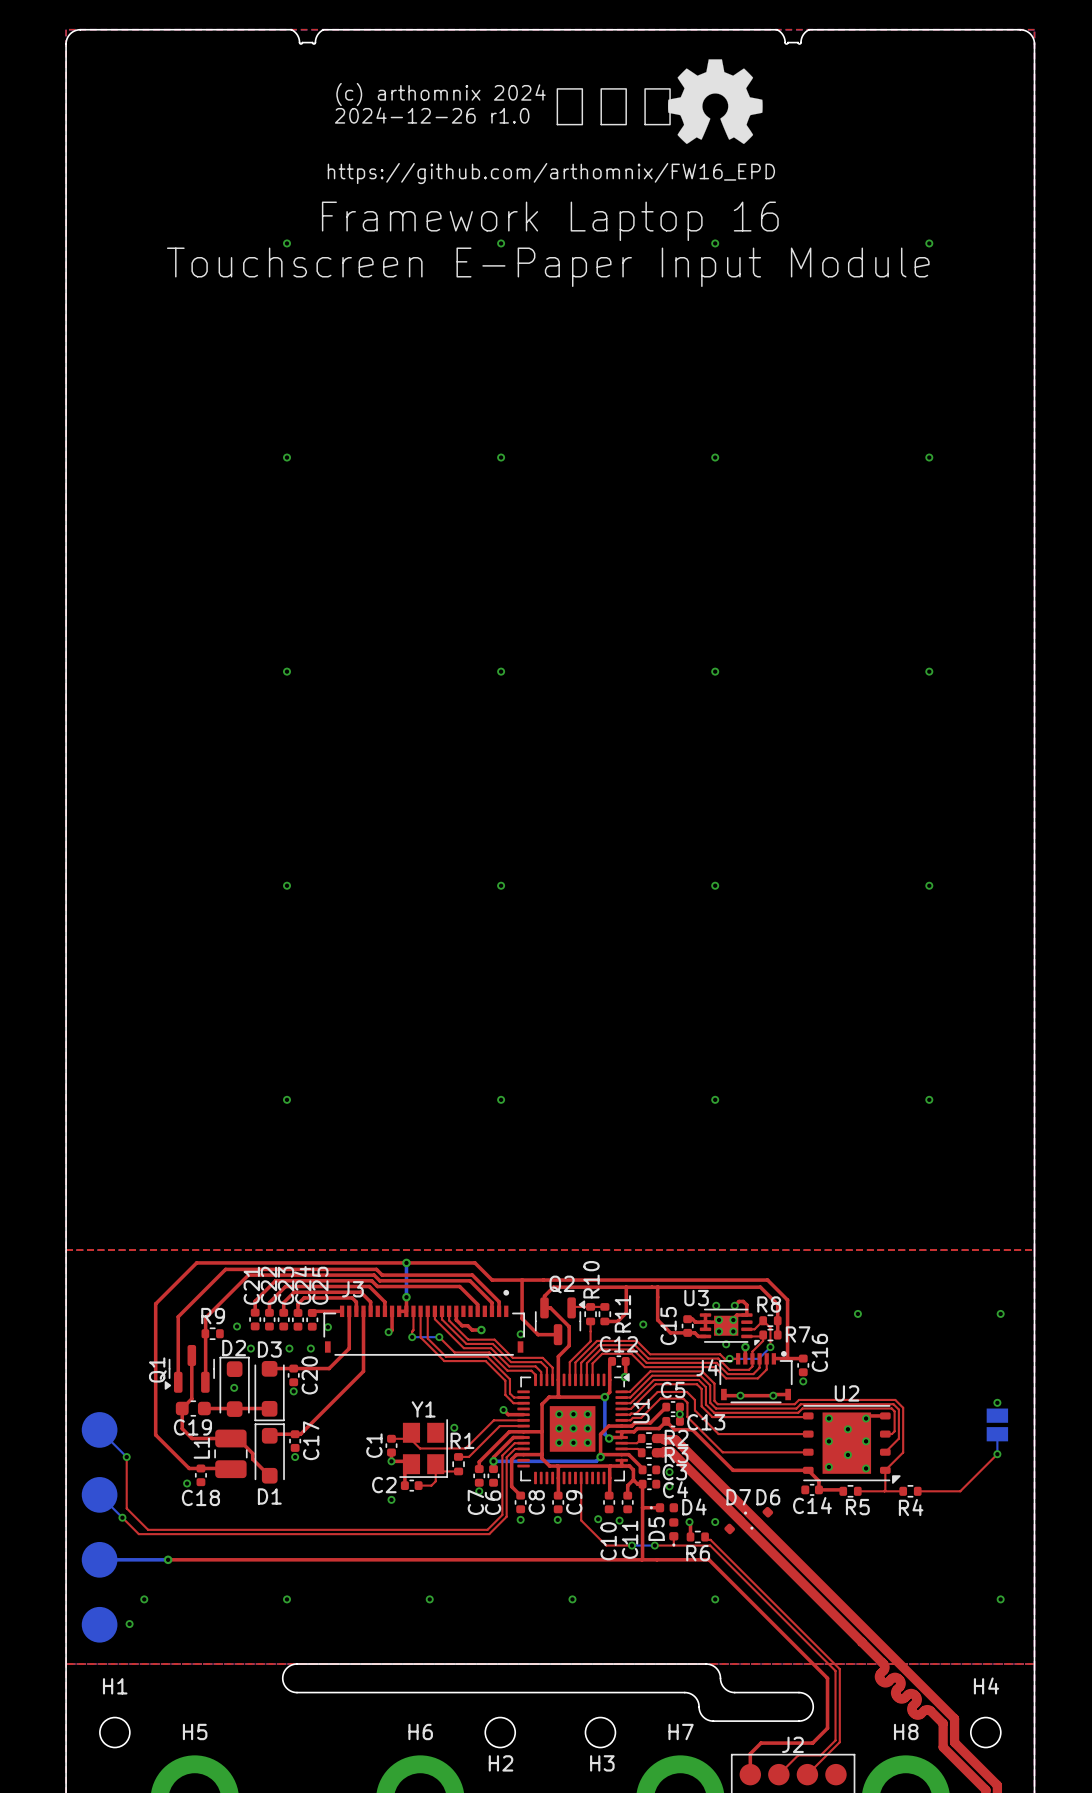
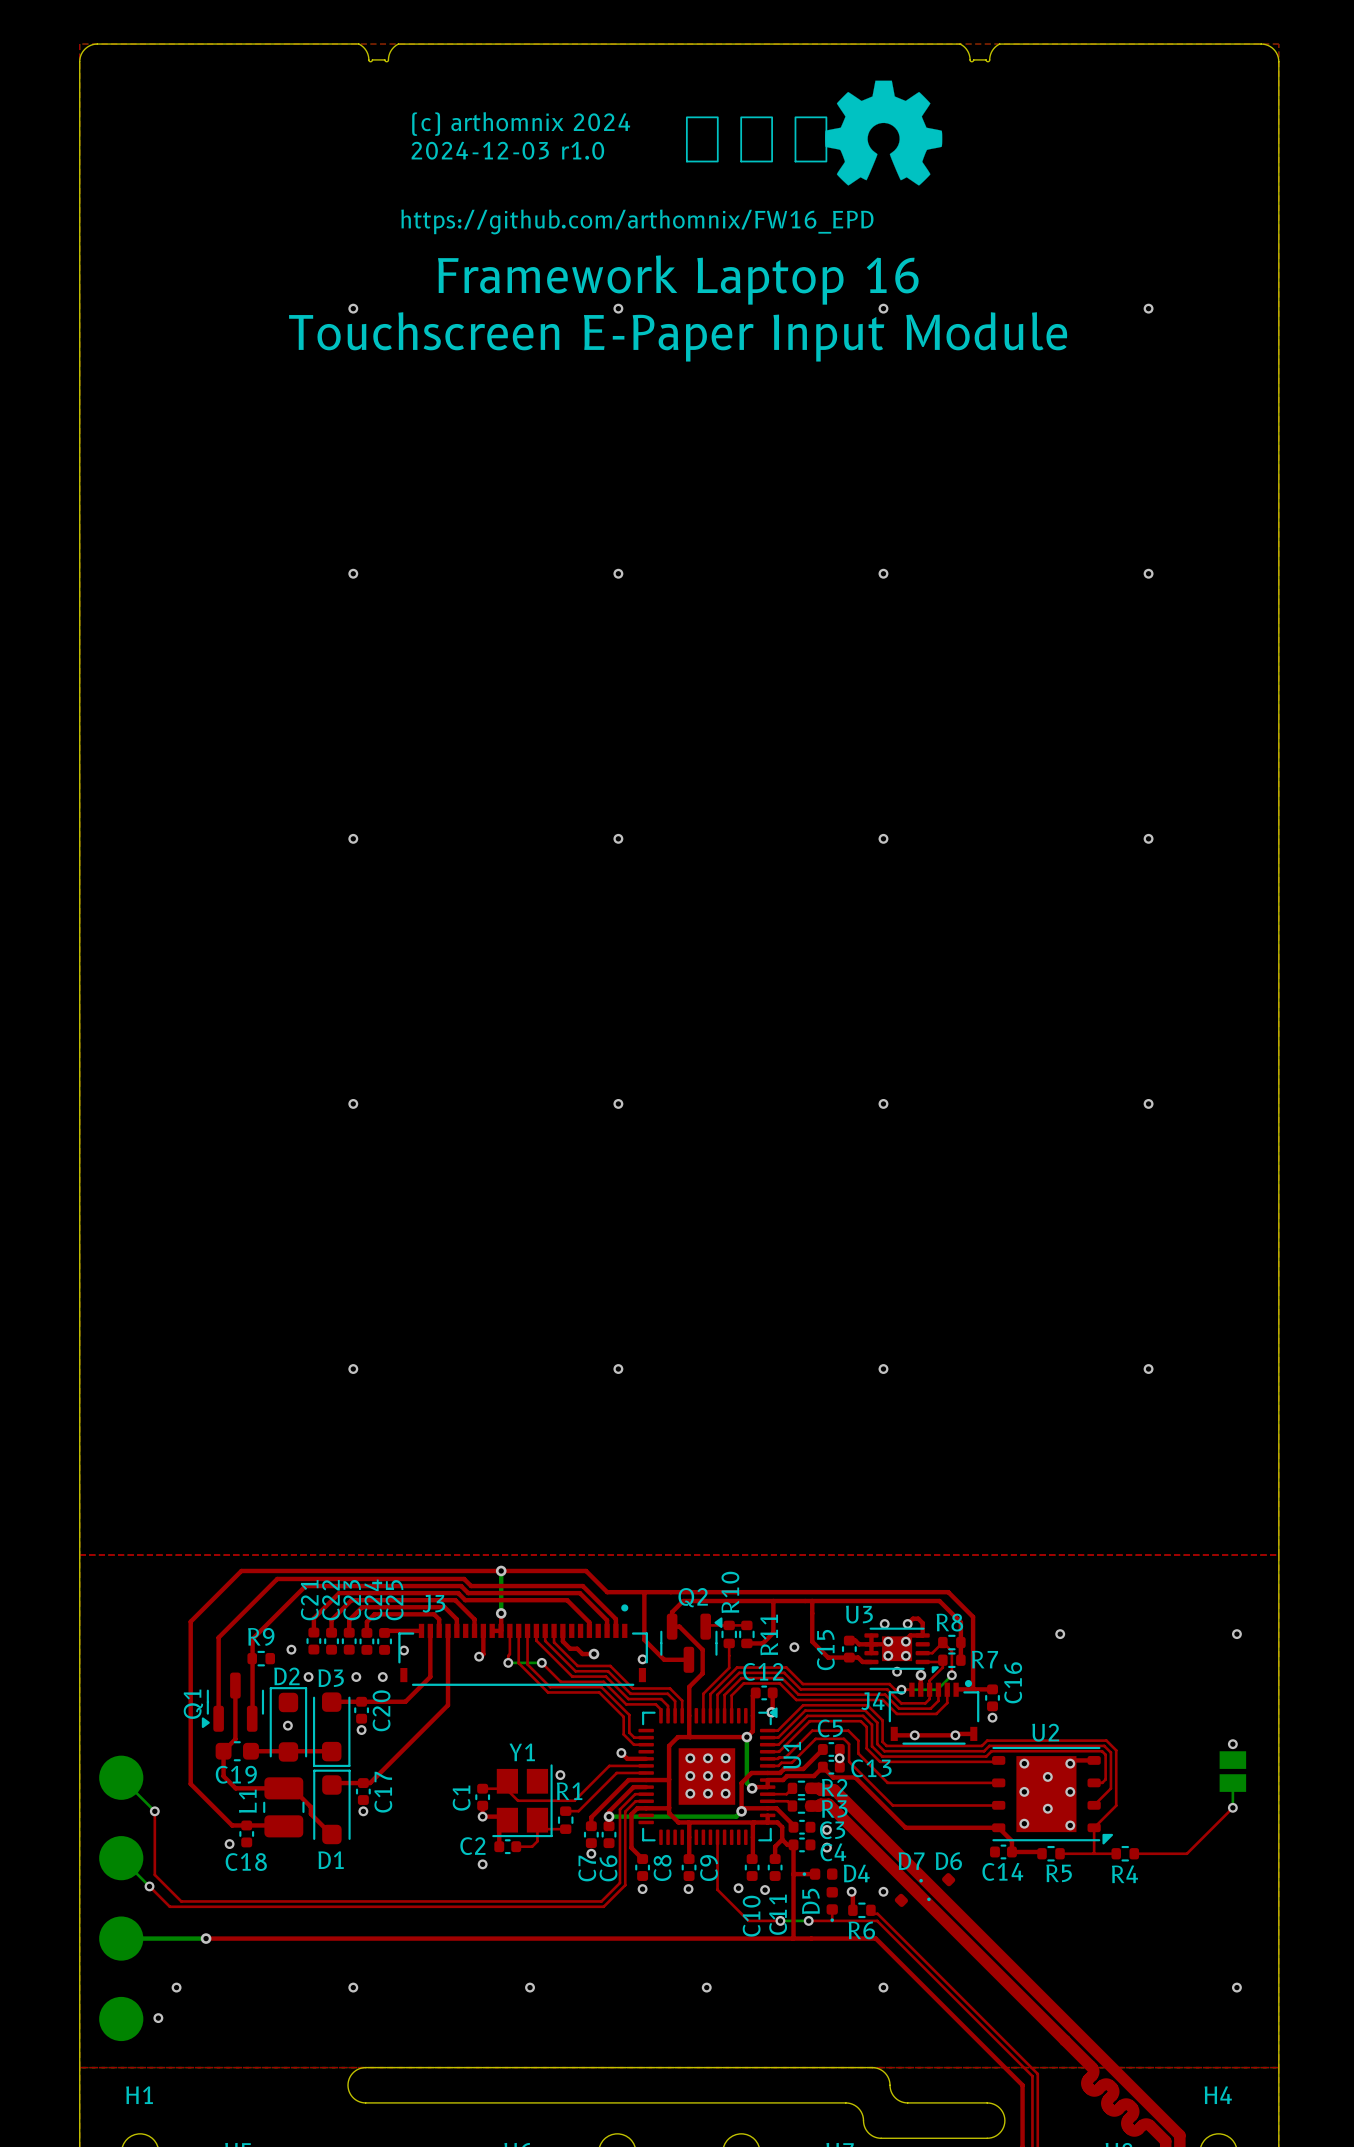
text: 2024-12-26 r1.0 (432, 115) -> 2024-12-03 r1.0 (507, 150)

